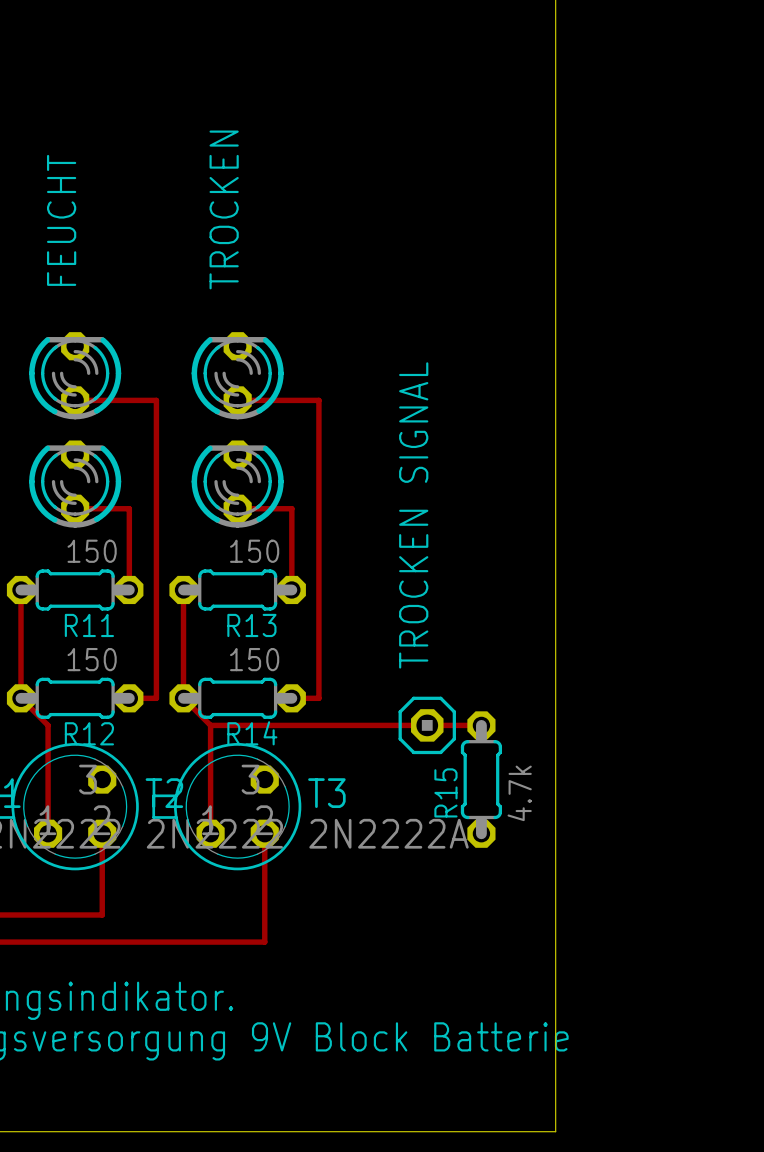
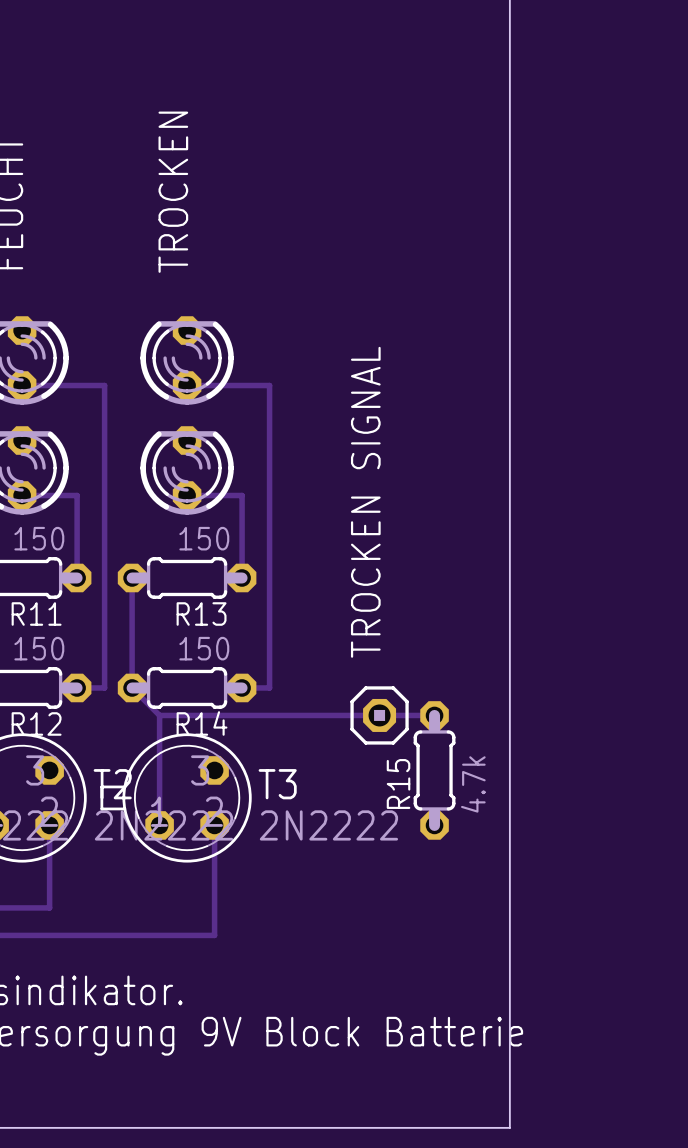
T3 value: 2N2222A (389, 833) -> 2N2222 (328, 825)

